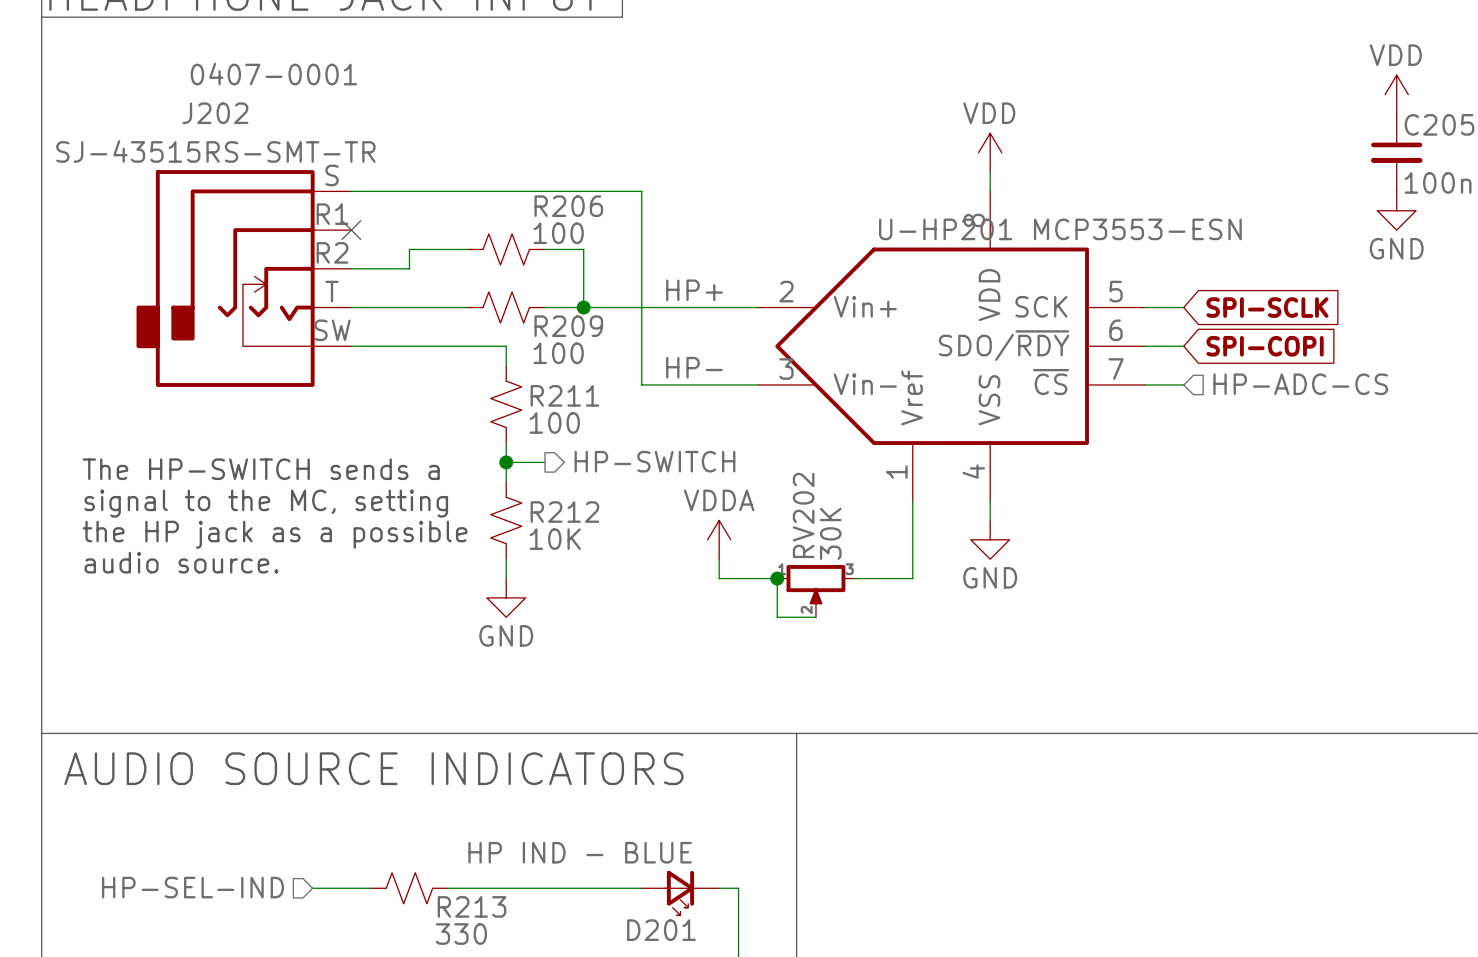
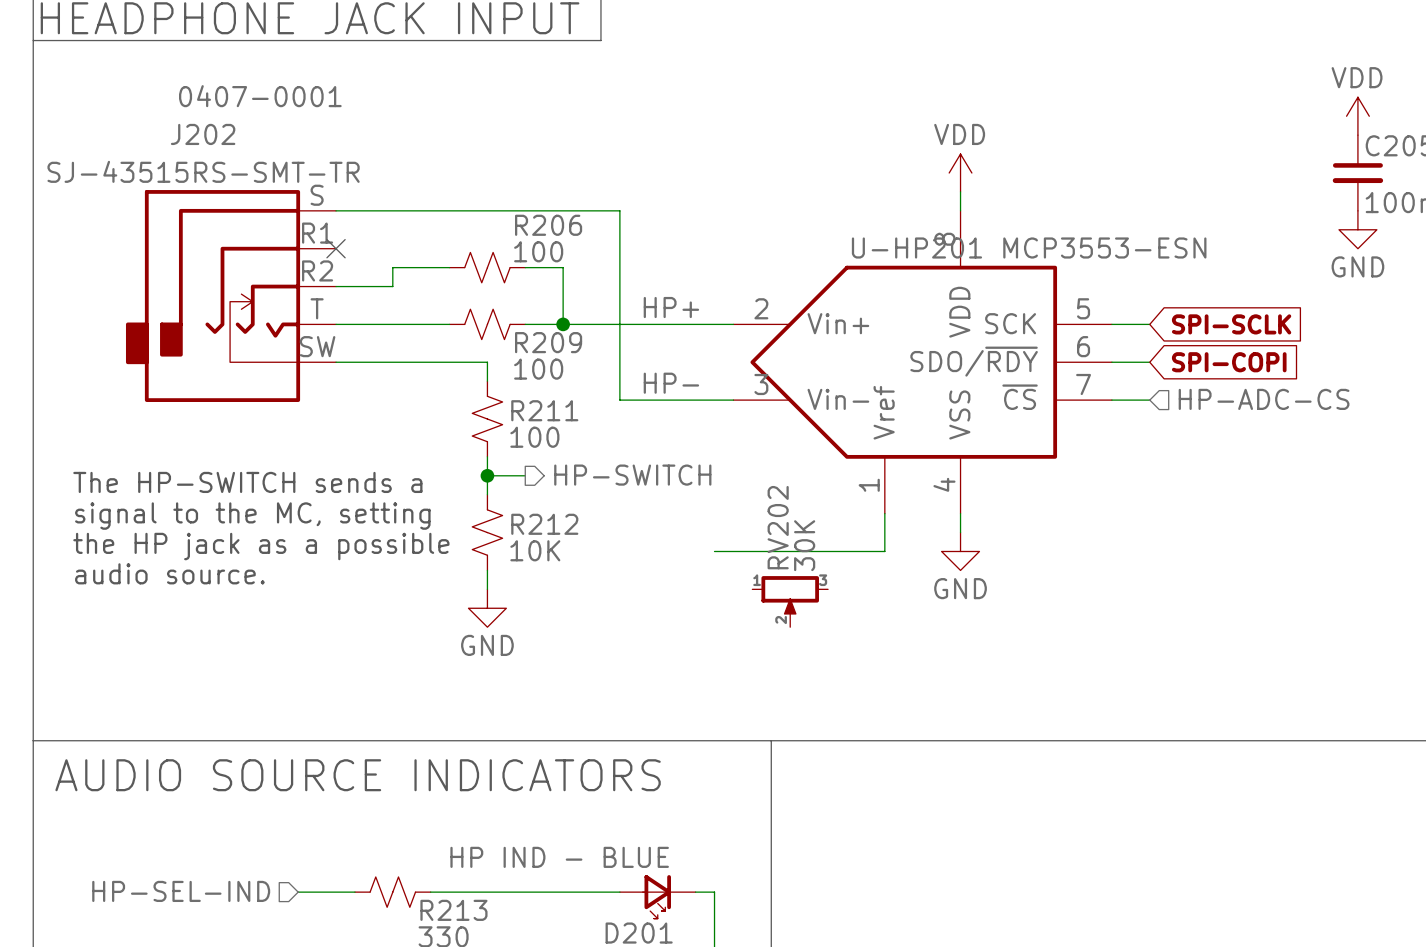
power symbol: VDDA (719, 539) -> none
wire: (912, 539) (912, 578) (854, 578) -> (884, 551) (714, 551)
wire: (719, 559) (719, 578) (777, 578) (777, 617) (815, 617) -> none
junction: (777, 578) -> none

